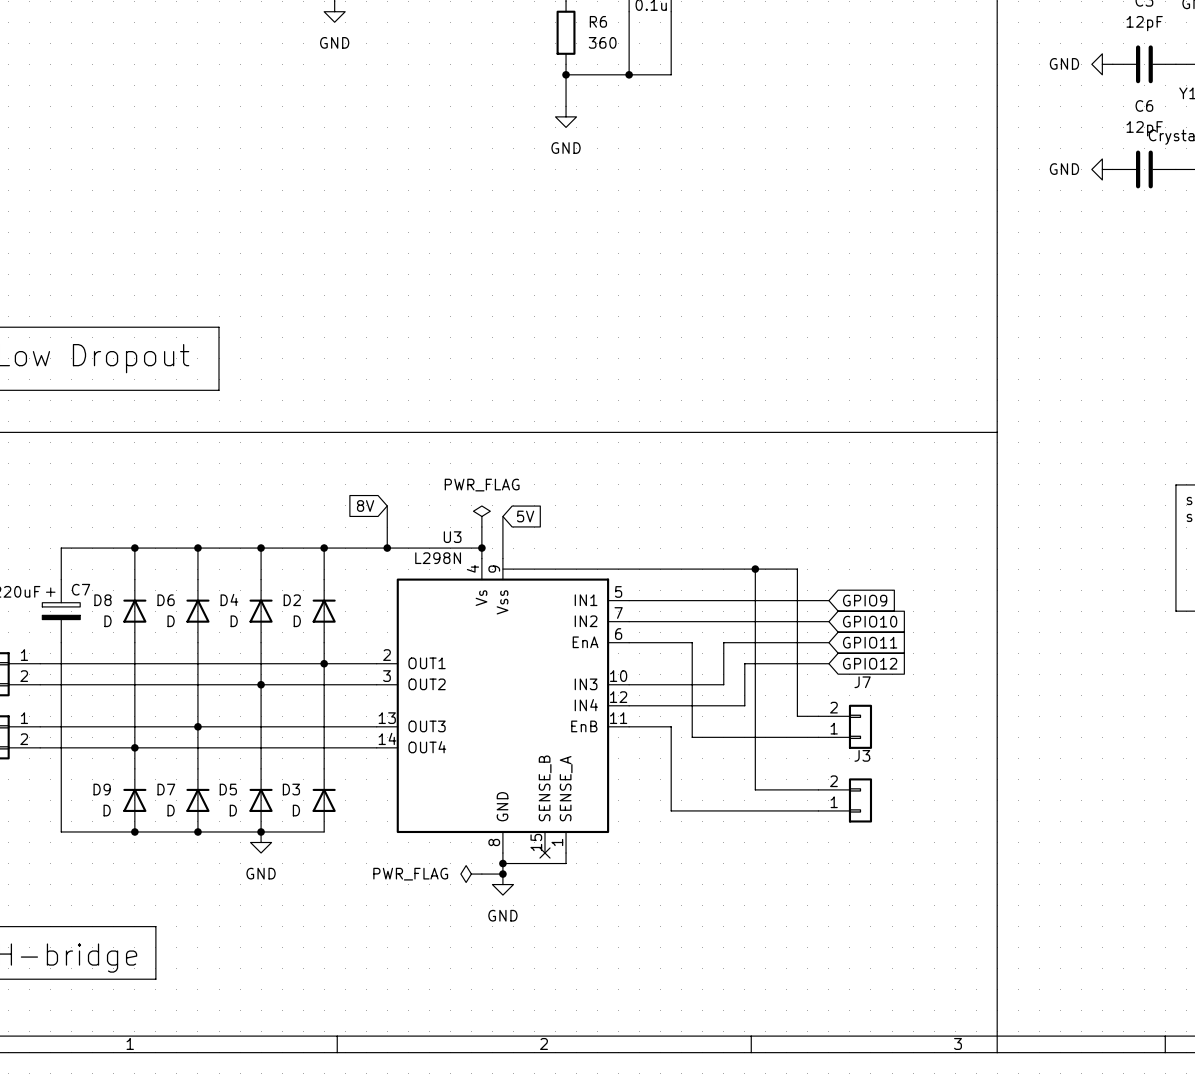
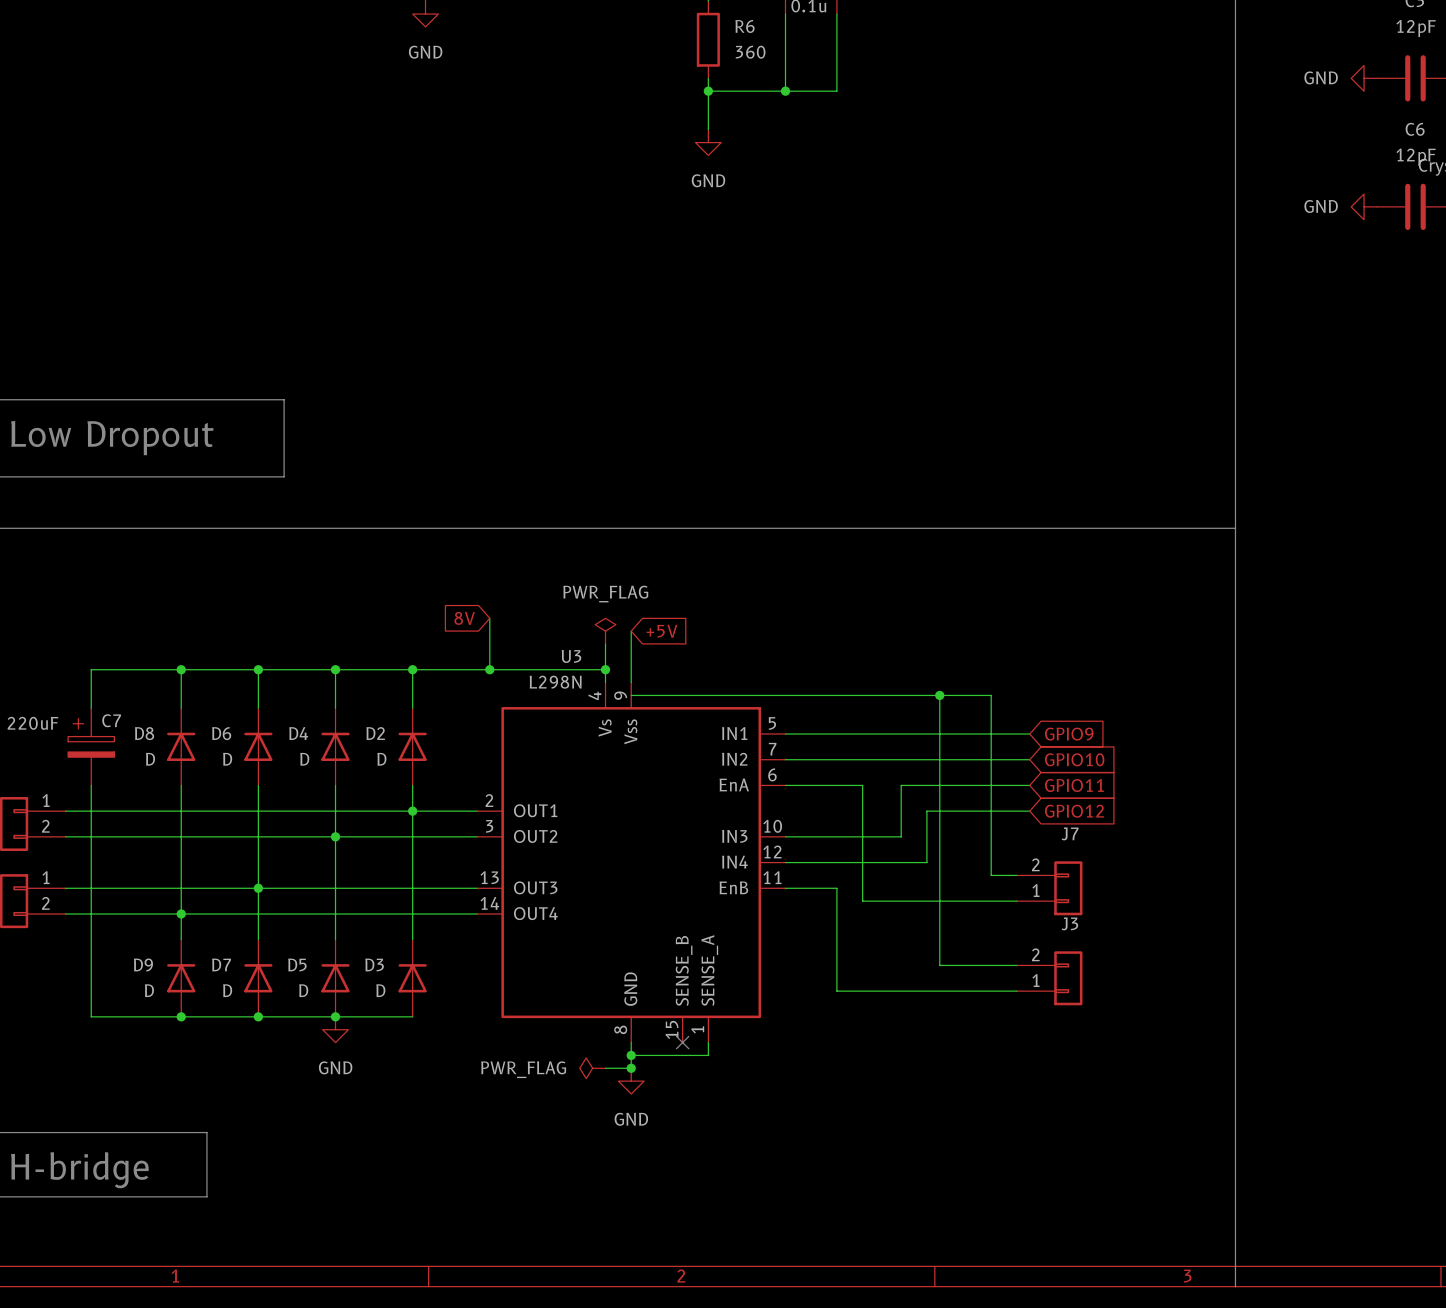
global label: 5V (525, 516) -> +5V (661, 631)

